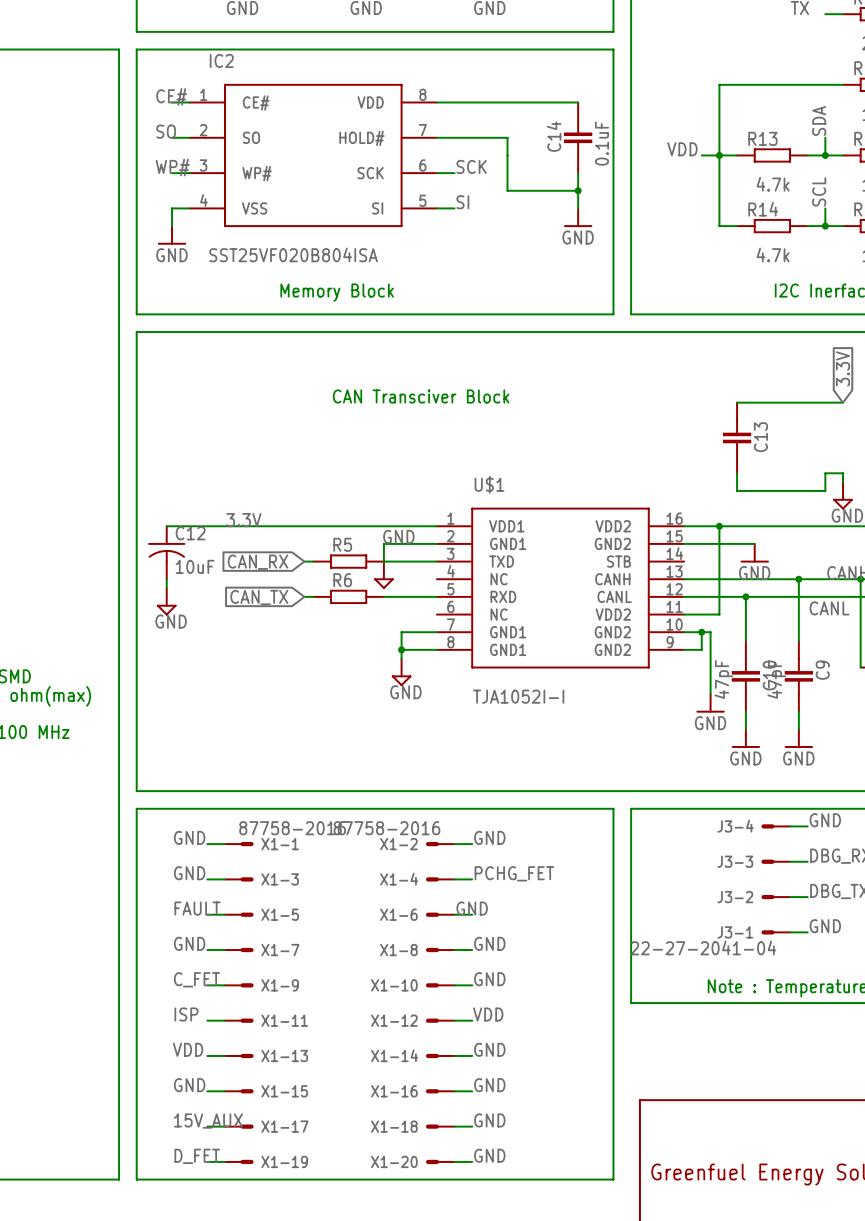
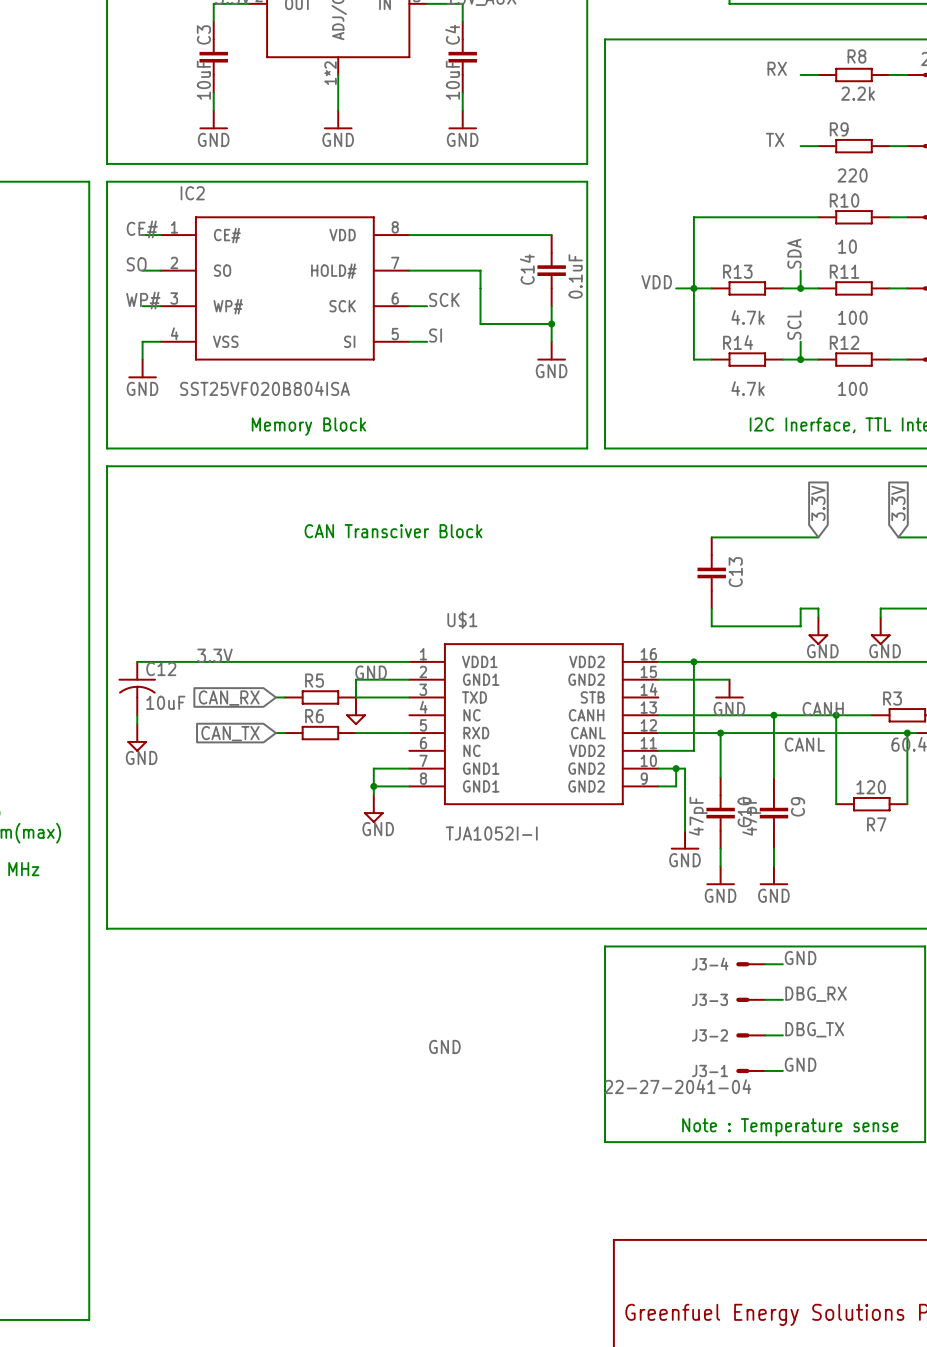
wire: (136, 808) (136, 1179) (613, 1179) (613, 808) (136, 808) -> none
label: GND (189, 837) -> none
label: GND (489, 837) -> none
wire: (207, 844) (225, 844) -> none
X1-1: 87758-2016 (239, 844) -> none
X1-2: 87758-2016 (440, 844) -> none
wire: (454, 844) (472, 844) -> none
label: GND (189, 873) -> none
label: PCHG_FET (514, 873) -> none
wire: (207, 879) (225, 879) -> none
X1-3: (239, 879) -> none
X1-4: (440, 879) -> none
wire: (454, 879) (472, 879) -> none
label: FAULT (197, 908) -> none
wire: (207, 914) (225, 914) -> none
X1-5: (239, 914) -> none
X1-6: (440, 914) -> none
wire: (454, 914) (472, 914) -> none
label: GND (189, 943) -> none
label: GND (489, 943) -> none
wire: (207, 950) (225, 950) -> none
X1-7: (239, 950) -> none
X1-8: (440, 950) -> none
wire: (454, 950) (472, 950) -> none
label: C_FET (197, 979) -> none
label: GND (489, 979) -> none
wire: (207, 985) (225, 985) -> none
X1-9: (239, 985) -> none
X1-10: (440, 985) -> none
wire: (454, 985) (472, 985) -> none
label: ISP (186, 1014) -> none
label: VDD (488, 1014) -> none
wire: (207, 1020) (225, 1020) -> none
X1-11: (239, 1020) -> none
X1-12: (440, 1020) -> none
wire: (454, 1020) (472, 1020) -> none
label: VDD (188, 1049) -> none
label: GND (489, 1049) -> none
wire: (207, 1055) (225, 1055) -> none
X1-13: (239, 1055) -> none
X1-14: (440, 1055) -> none
wire: (454, 1055) (472, 1055) -> none
label: GND (189, 1085) -> none
label: GND (489, 1085) -> none
wire: (207, 1091) (225, 1091) -> none
X1-15: (239, 1091) -> none
X1-16: (440, 1091) -> none
wire: (454, 1091) (472, 1091) -> none
label: GND (489, 1120) -> none
label: 15V_AUX (208, 1121) -> none
wire: (207, 1126) (225, 1126) -> none
X1-17: (239, 1126) -> none
X1-18: (440, 1126) -> none
wire: (454, 1126) (472, 1126) -> none
label: GND (489, 1155) -> none
label: D_FET (197, 1156) -> none
wire: (207, 1161) (225, 1161) -> none
X1-19: (239, 1161) -> none
X1-20: (440, 1161) -> none
wire: (454, 1161) (472, 1161) -> none

